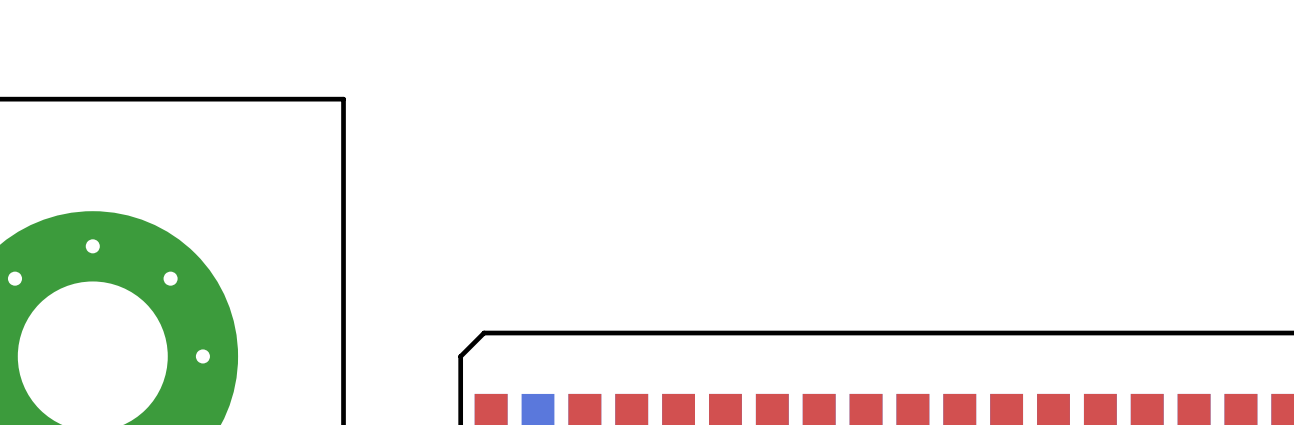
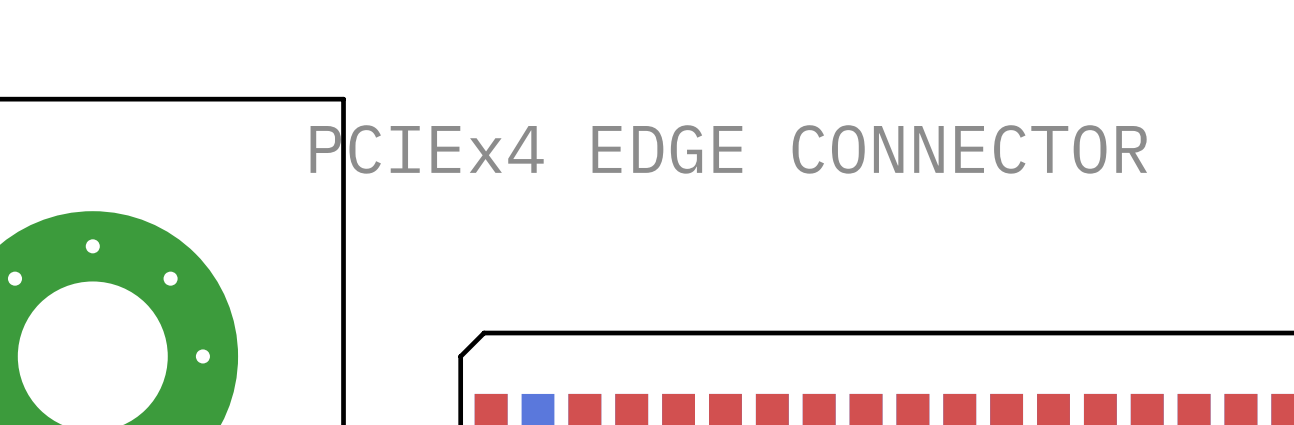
part value: none -> PCIEx4 EDGE CONNECTOR (728, 149)

